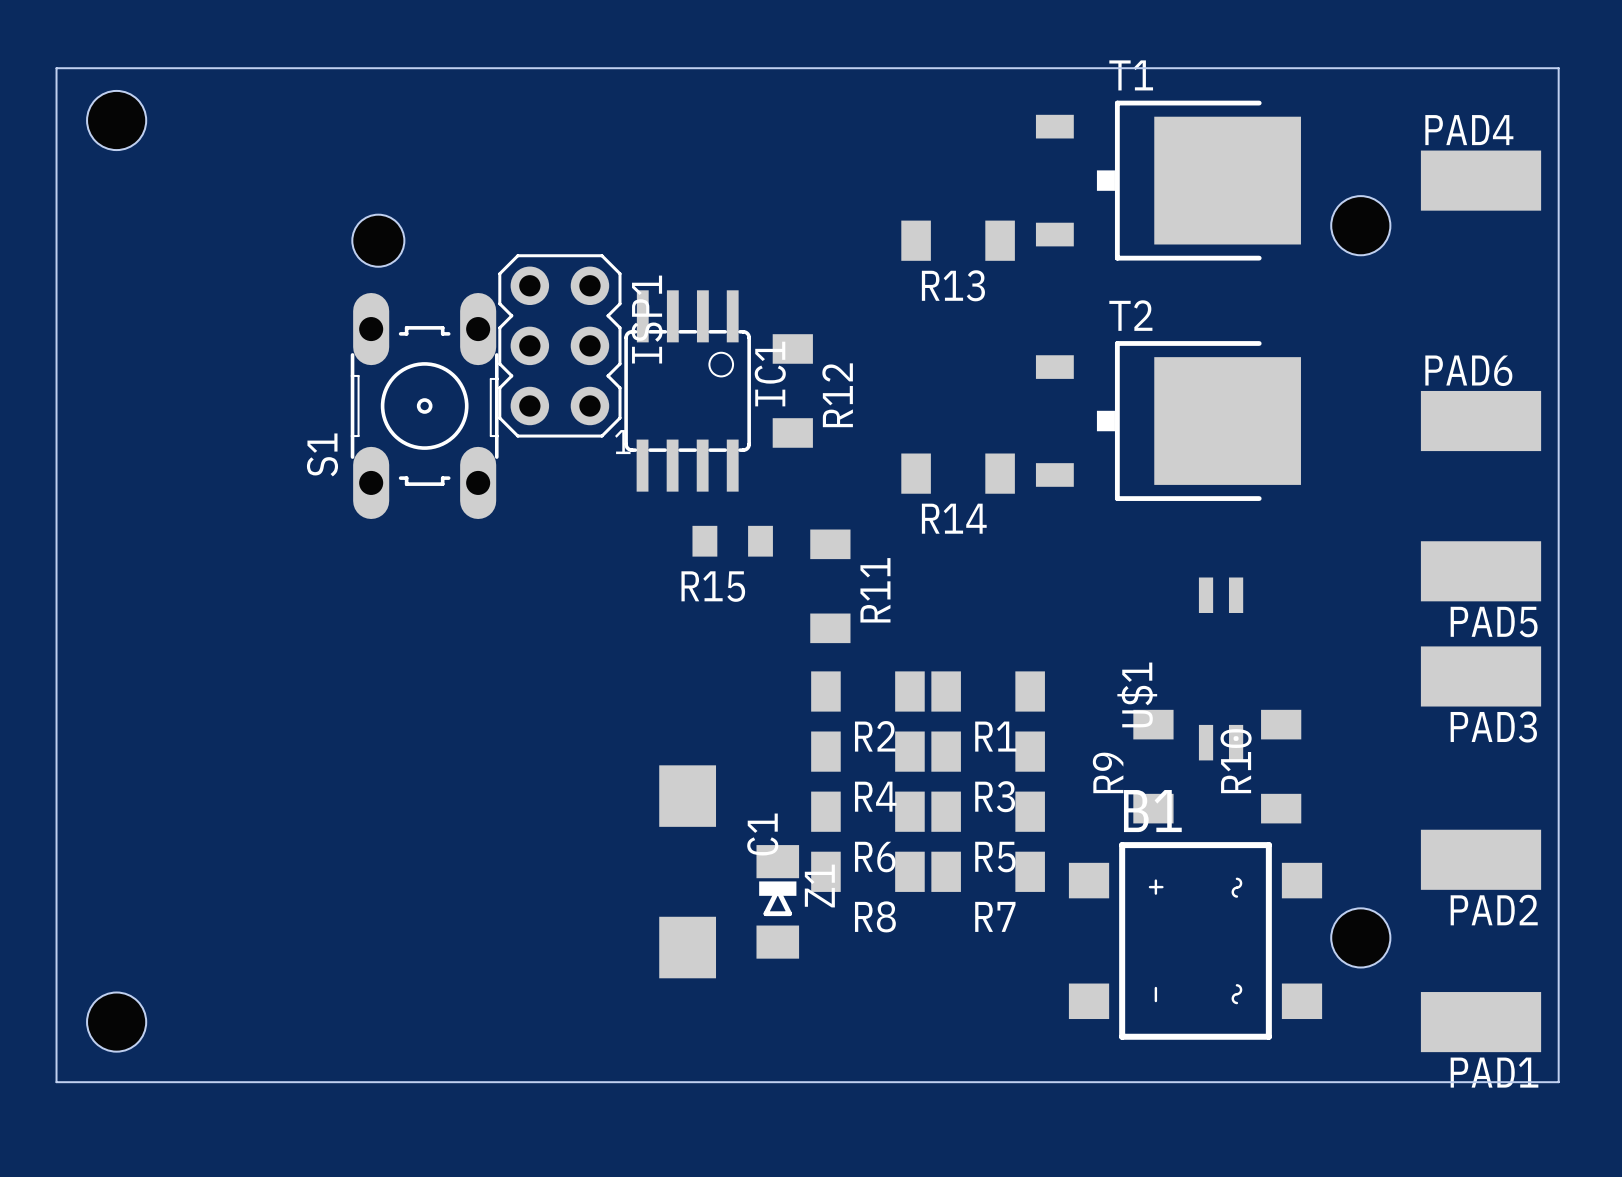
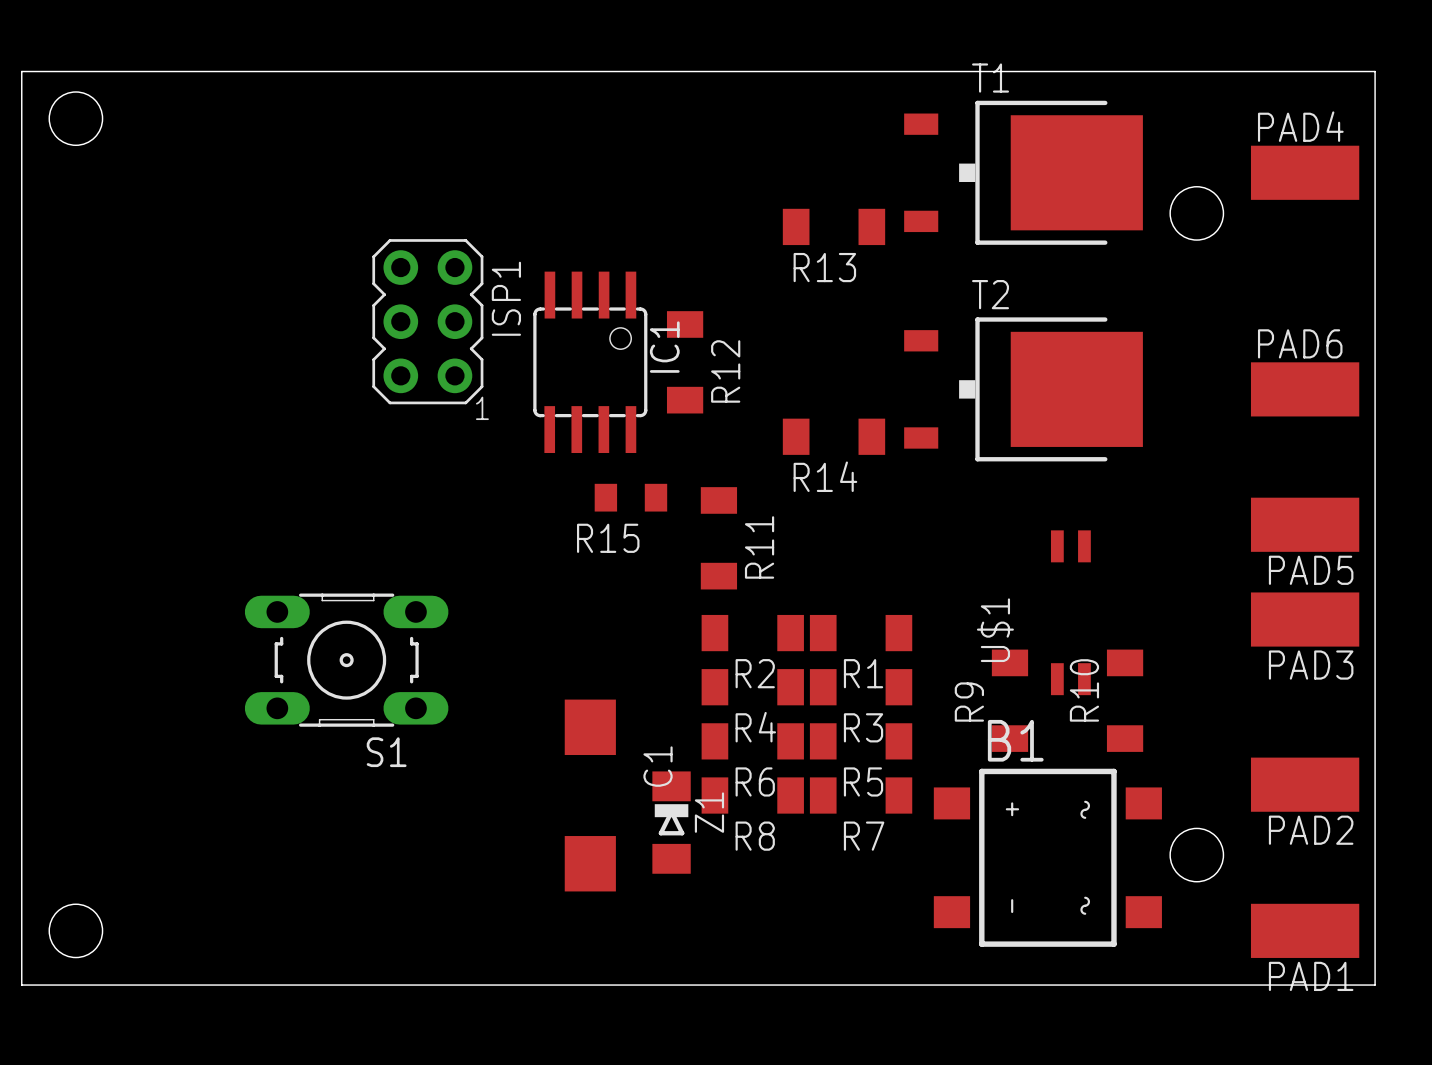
hole: (378, 240) -> none
ISP1 position: (559, 345) -> (427, 321)
S1 rotation: 0° (424, 406) -> 90° counterclockwise (346, 660)
S1 position: (424, 406) -> (346, 660)

